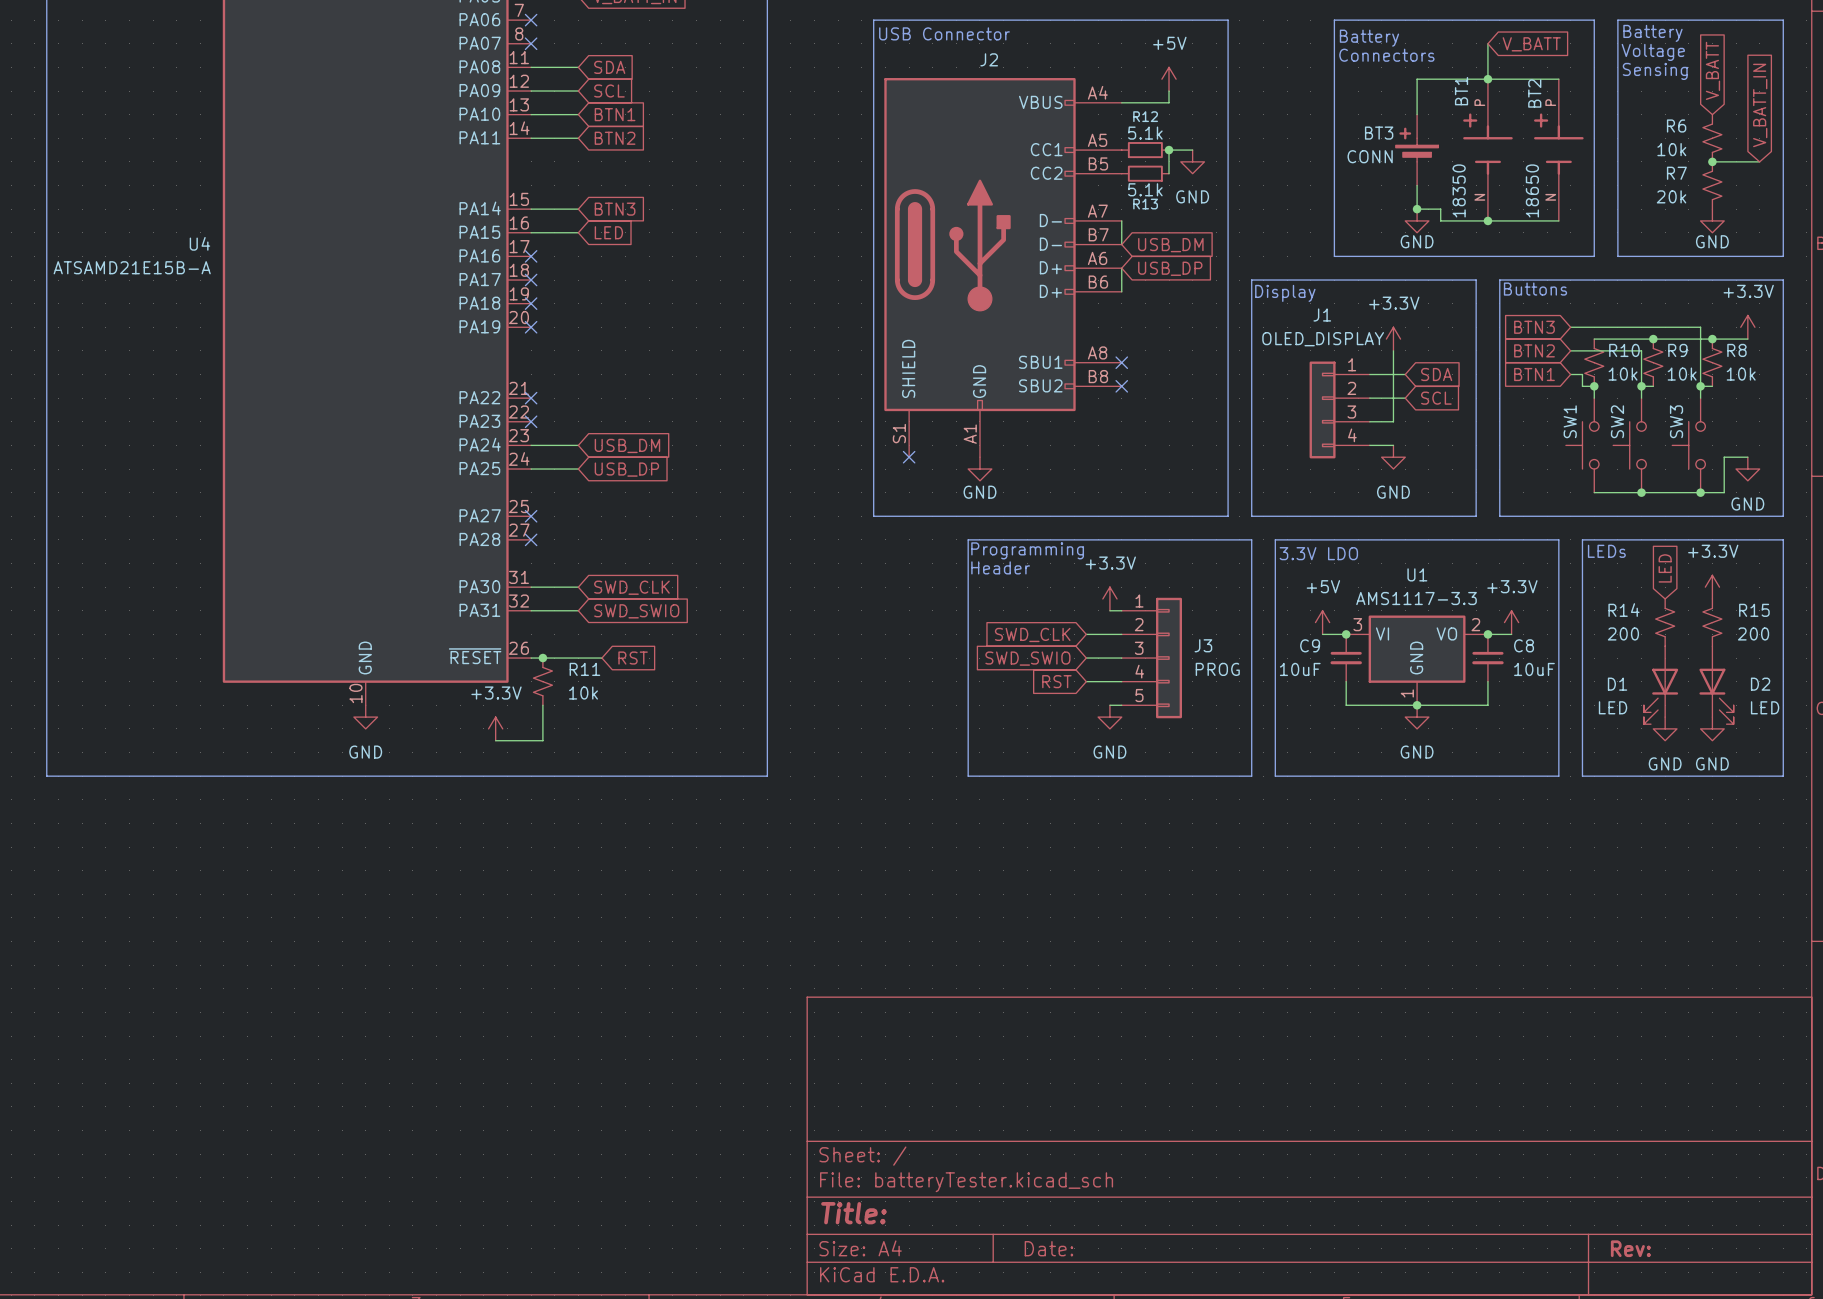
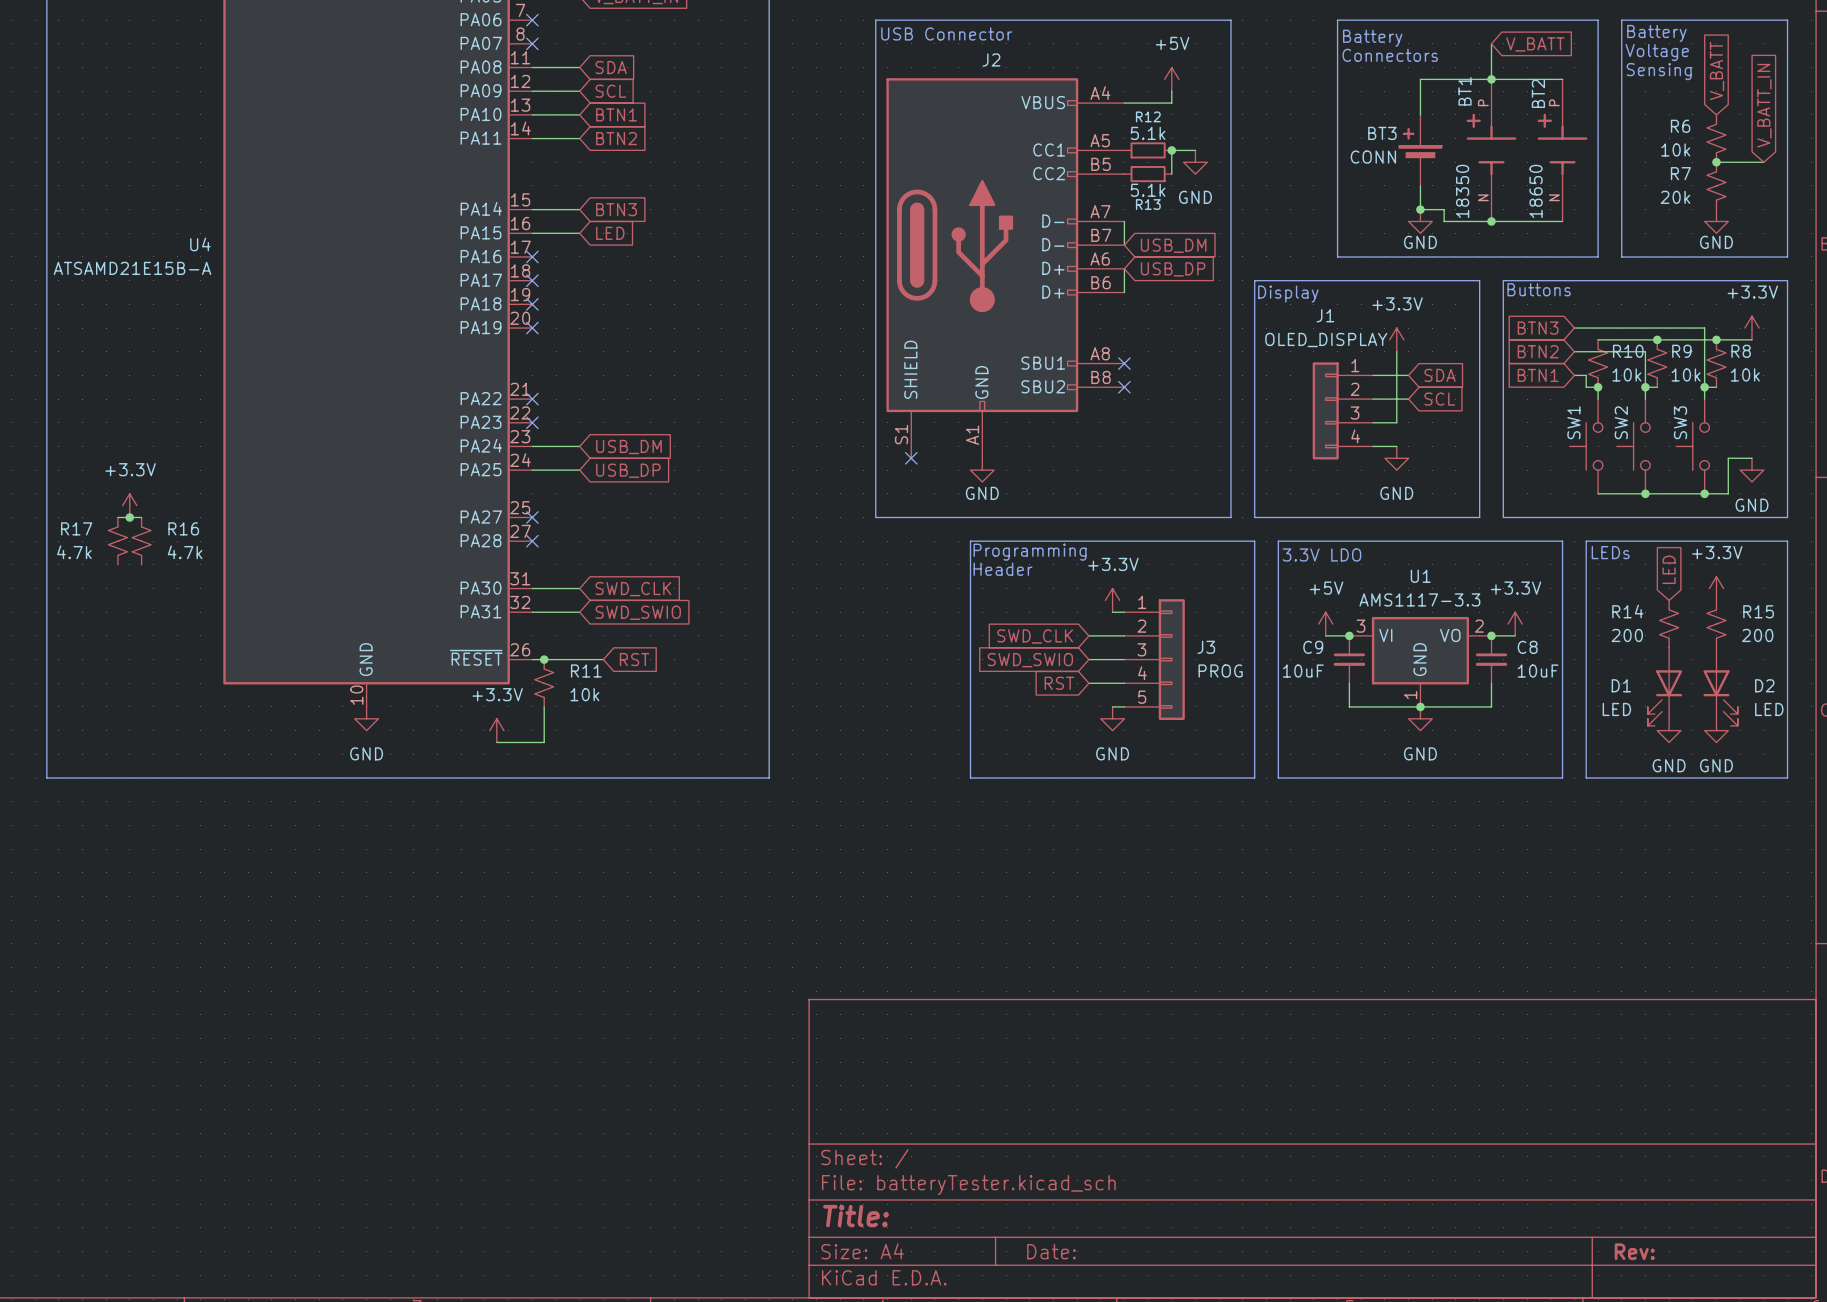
power symbol: none -> +3.3V (129, 505)
wire: none -> (117, 517) (141, 517)
junction: none -> (129, 517)
R17: none -> 4.7k (117, 541)
R16: none -> 4.7k (141, 541)

